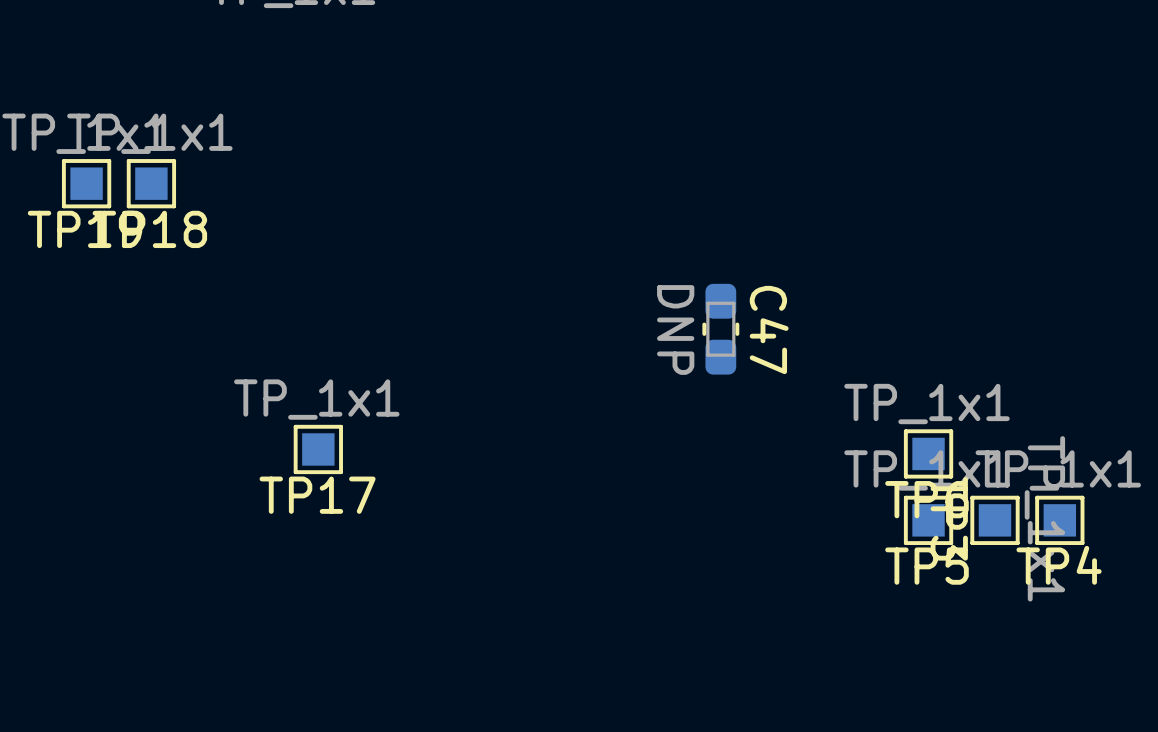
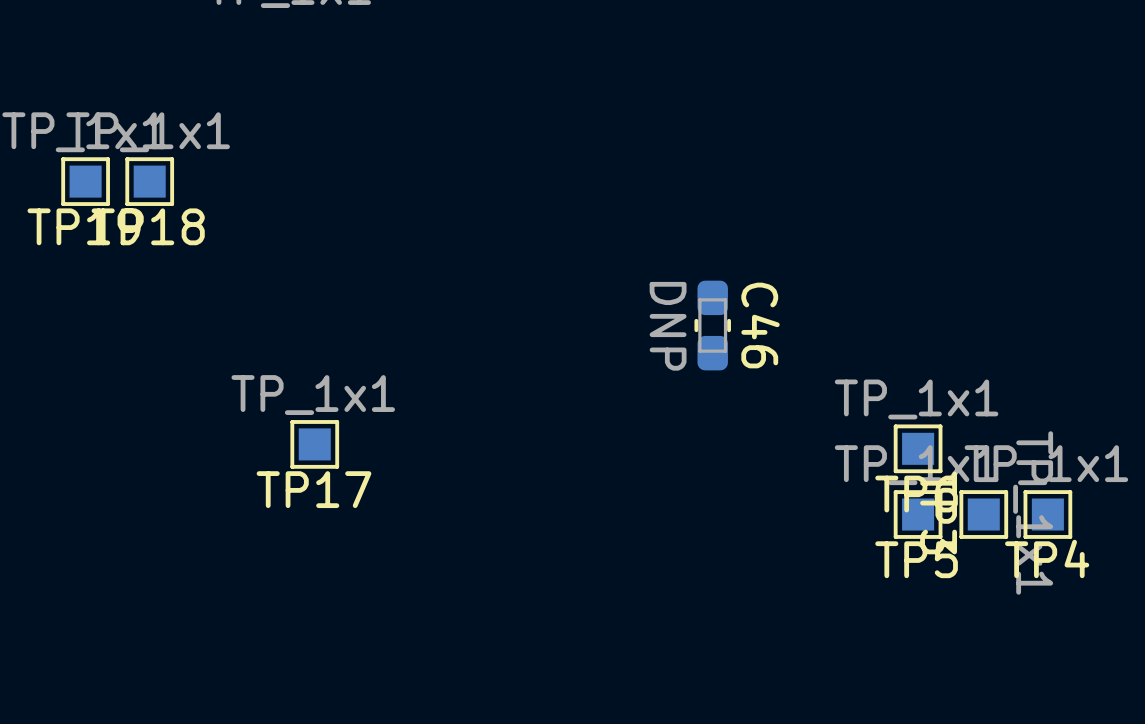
C47 name: C47 (769, 329) -> C46 (760, 325)

